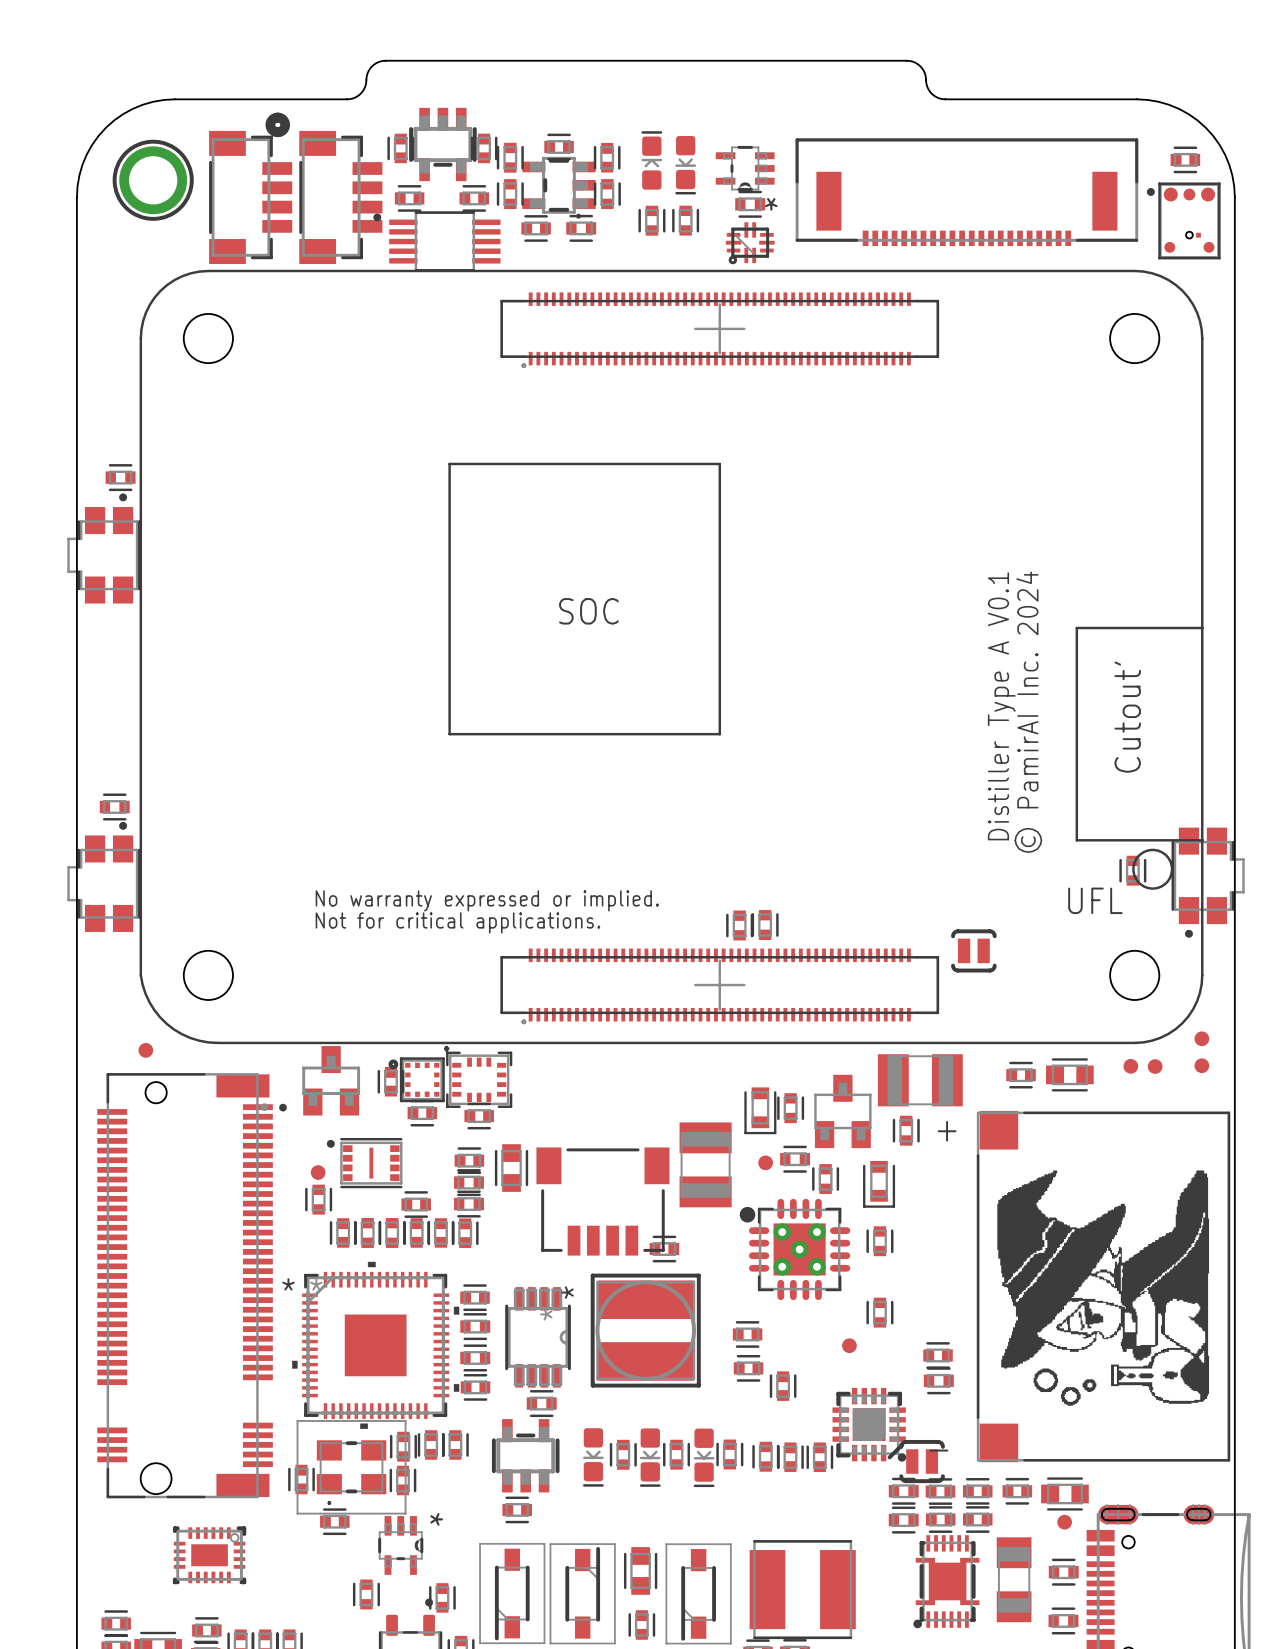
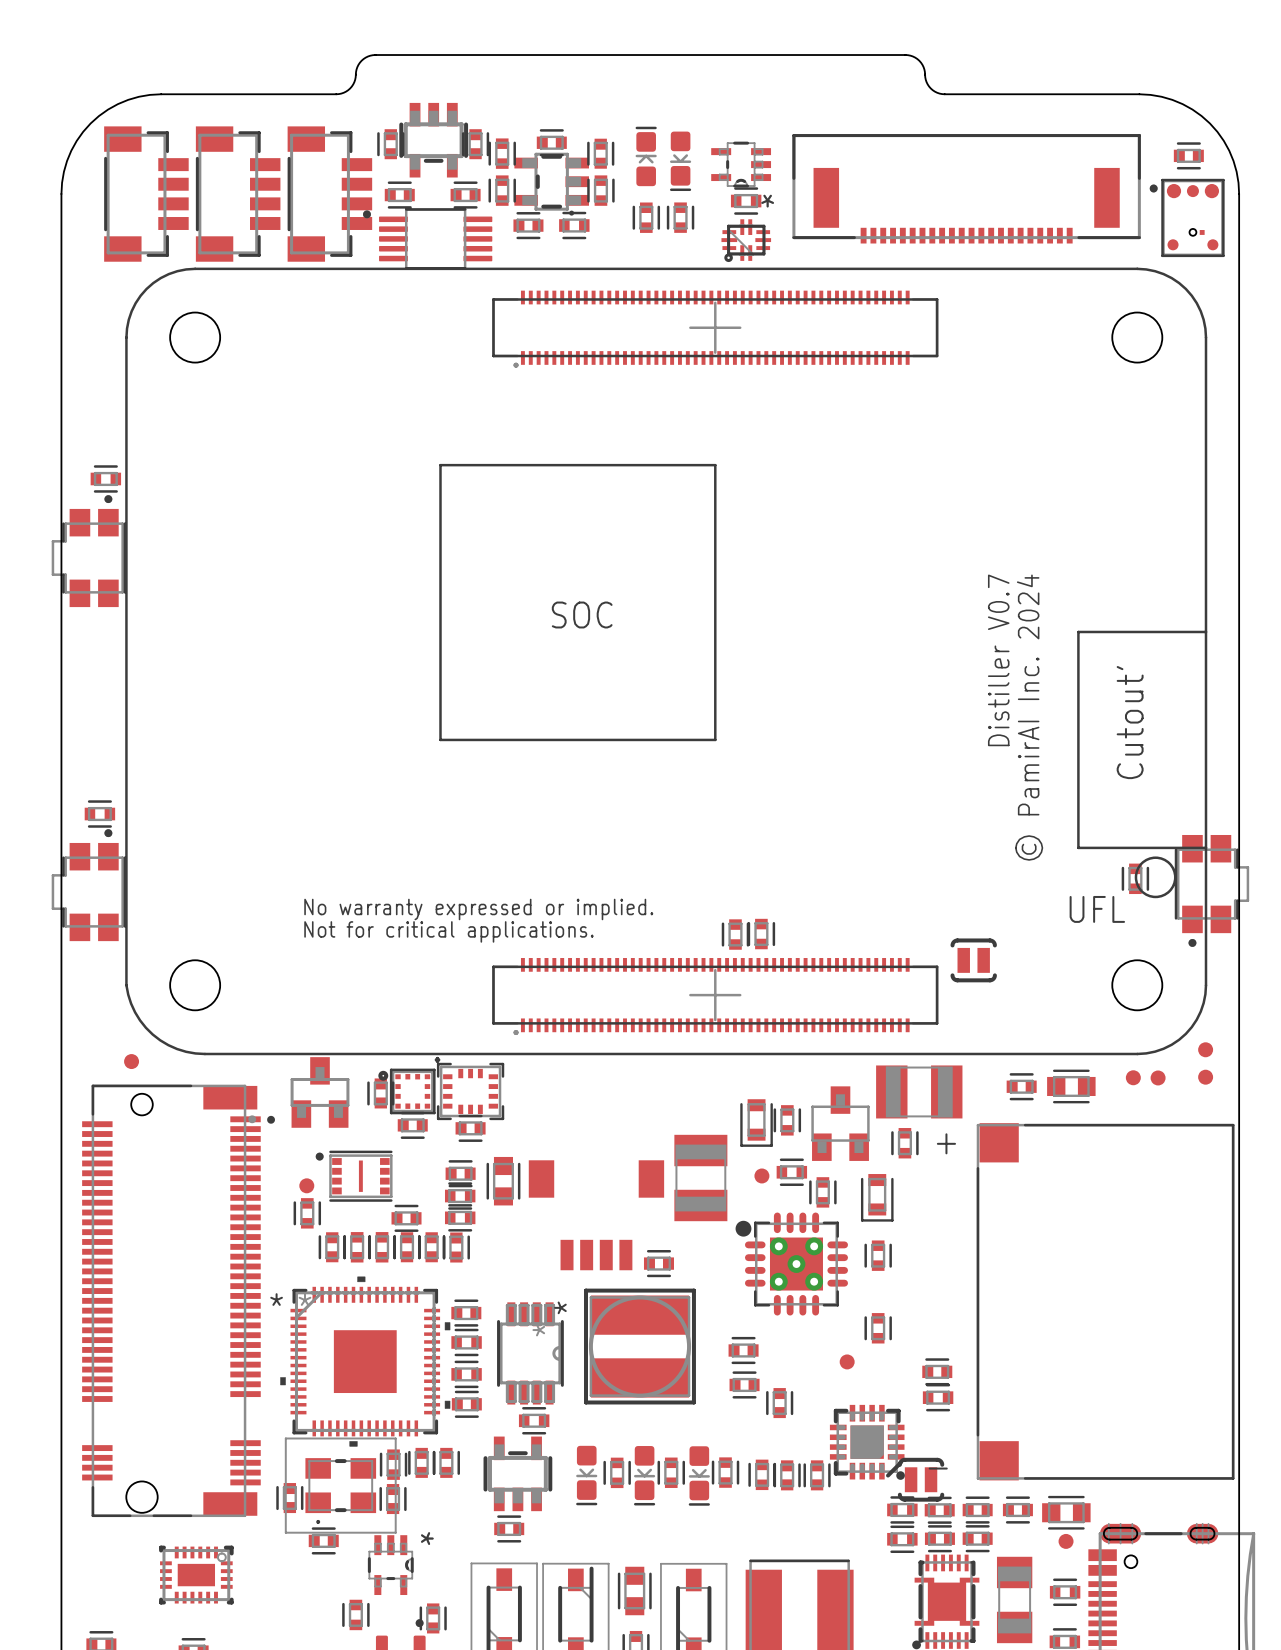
part: (277, 124) -> none
part footprint: [112, 139, 194, 221] -> [104, 126, 189, 262]
text: Distiller Type A V0.1 (1001, 706) -> Distiller V0.7 (998, 660)
part footprint: [536, 1147, 670, 1256] -> [528, 1160, 665, 1271]
drawing: [997, 1170, 1210, 1406] -> none

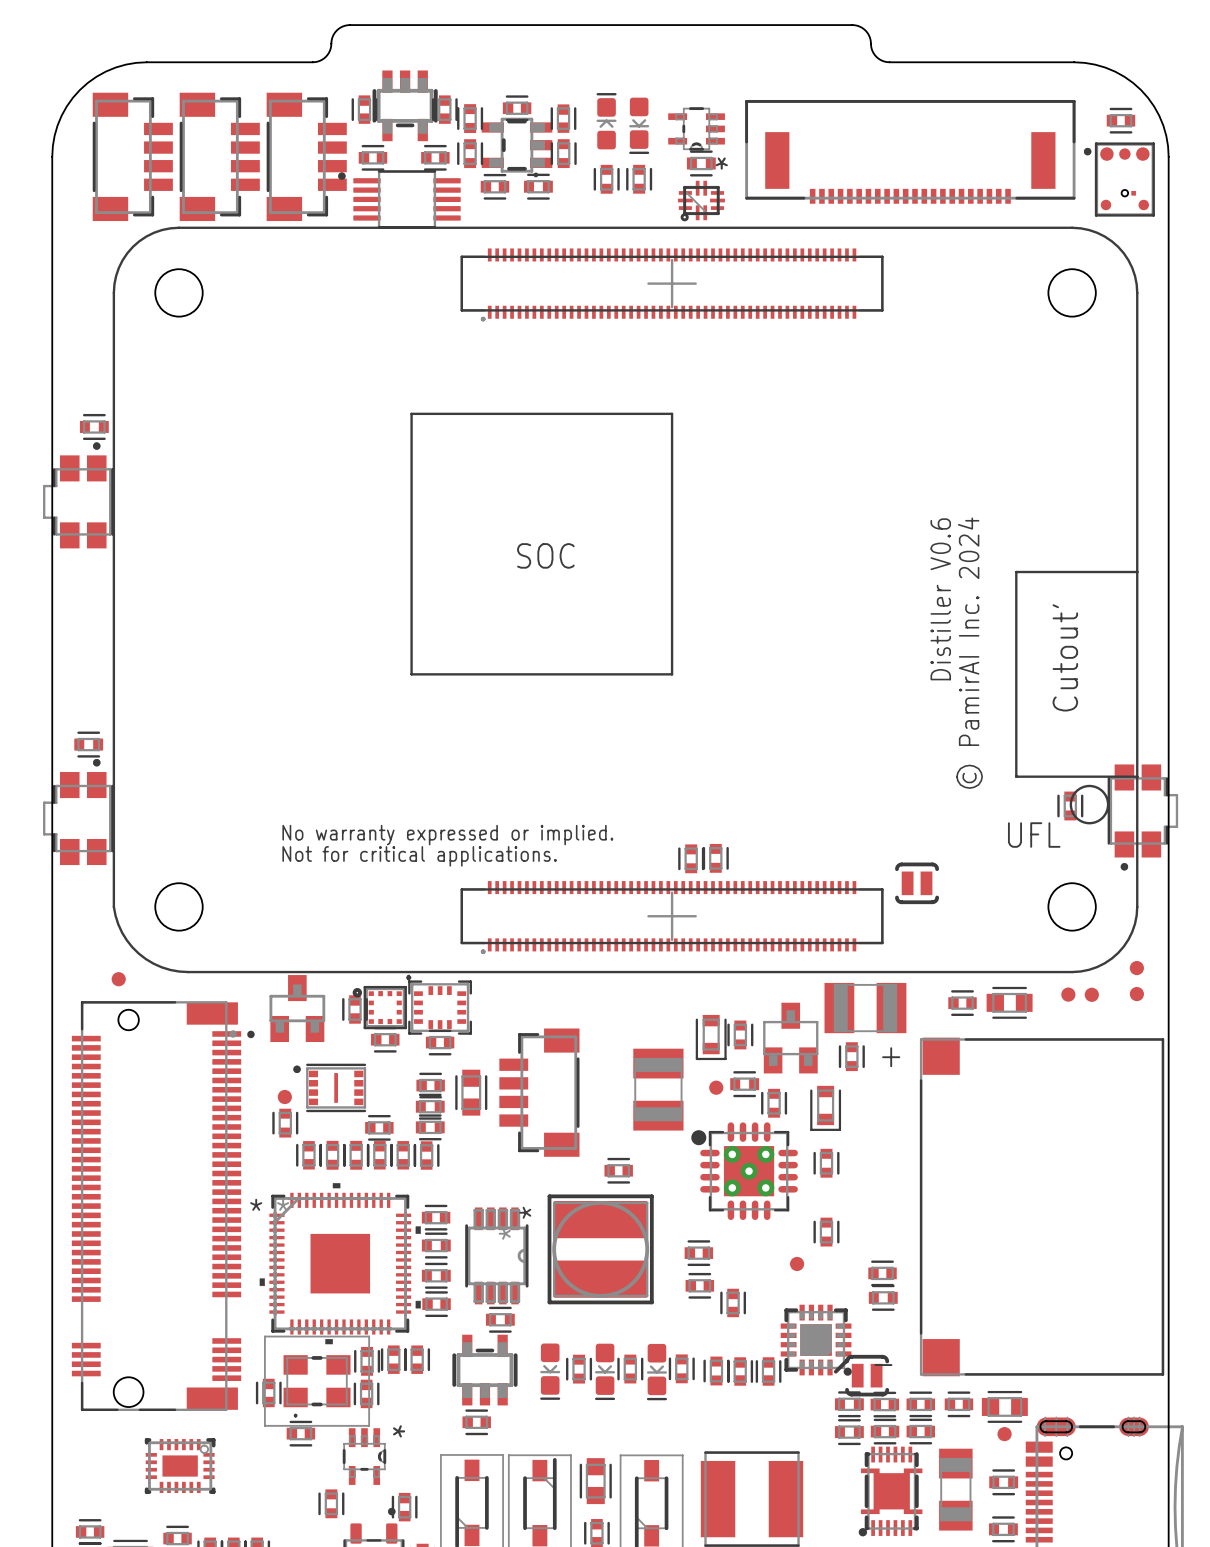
text: Distiller V0.7 (998, 660) -> Distiller V0.6 (940, 599)
part: none -> (539, 1092)
part: (596, 1215) -> none

